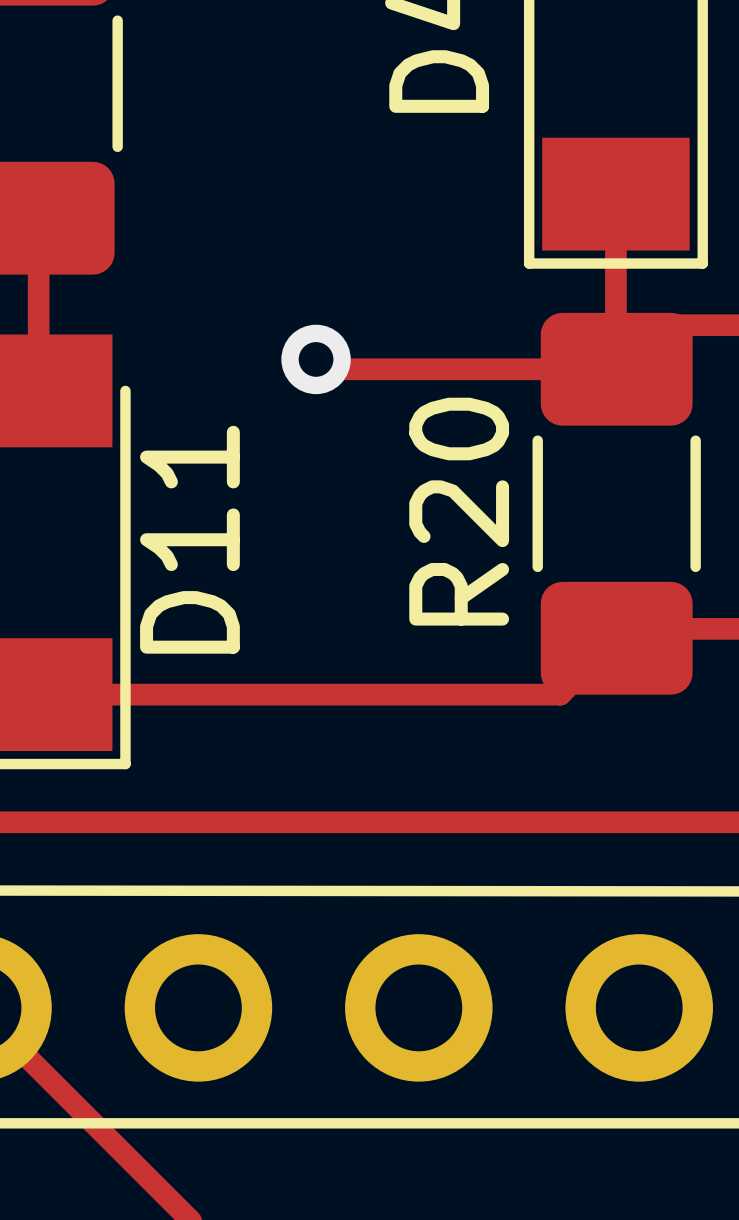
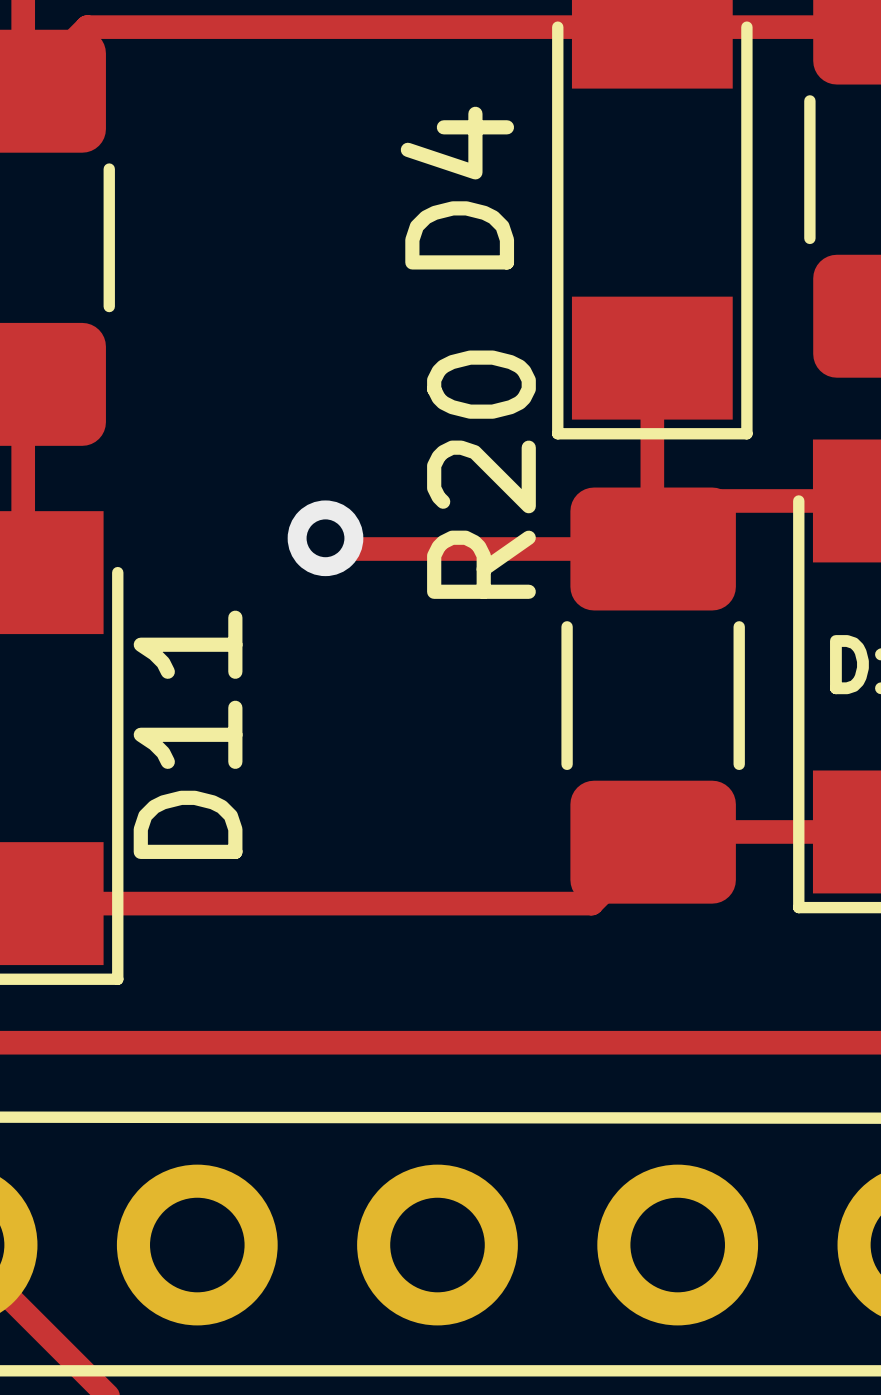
R20 name position: R20 (459, 511) -> R20 (481, 474)

